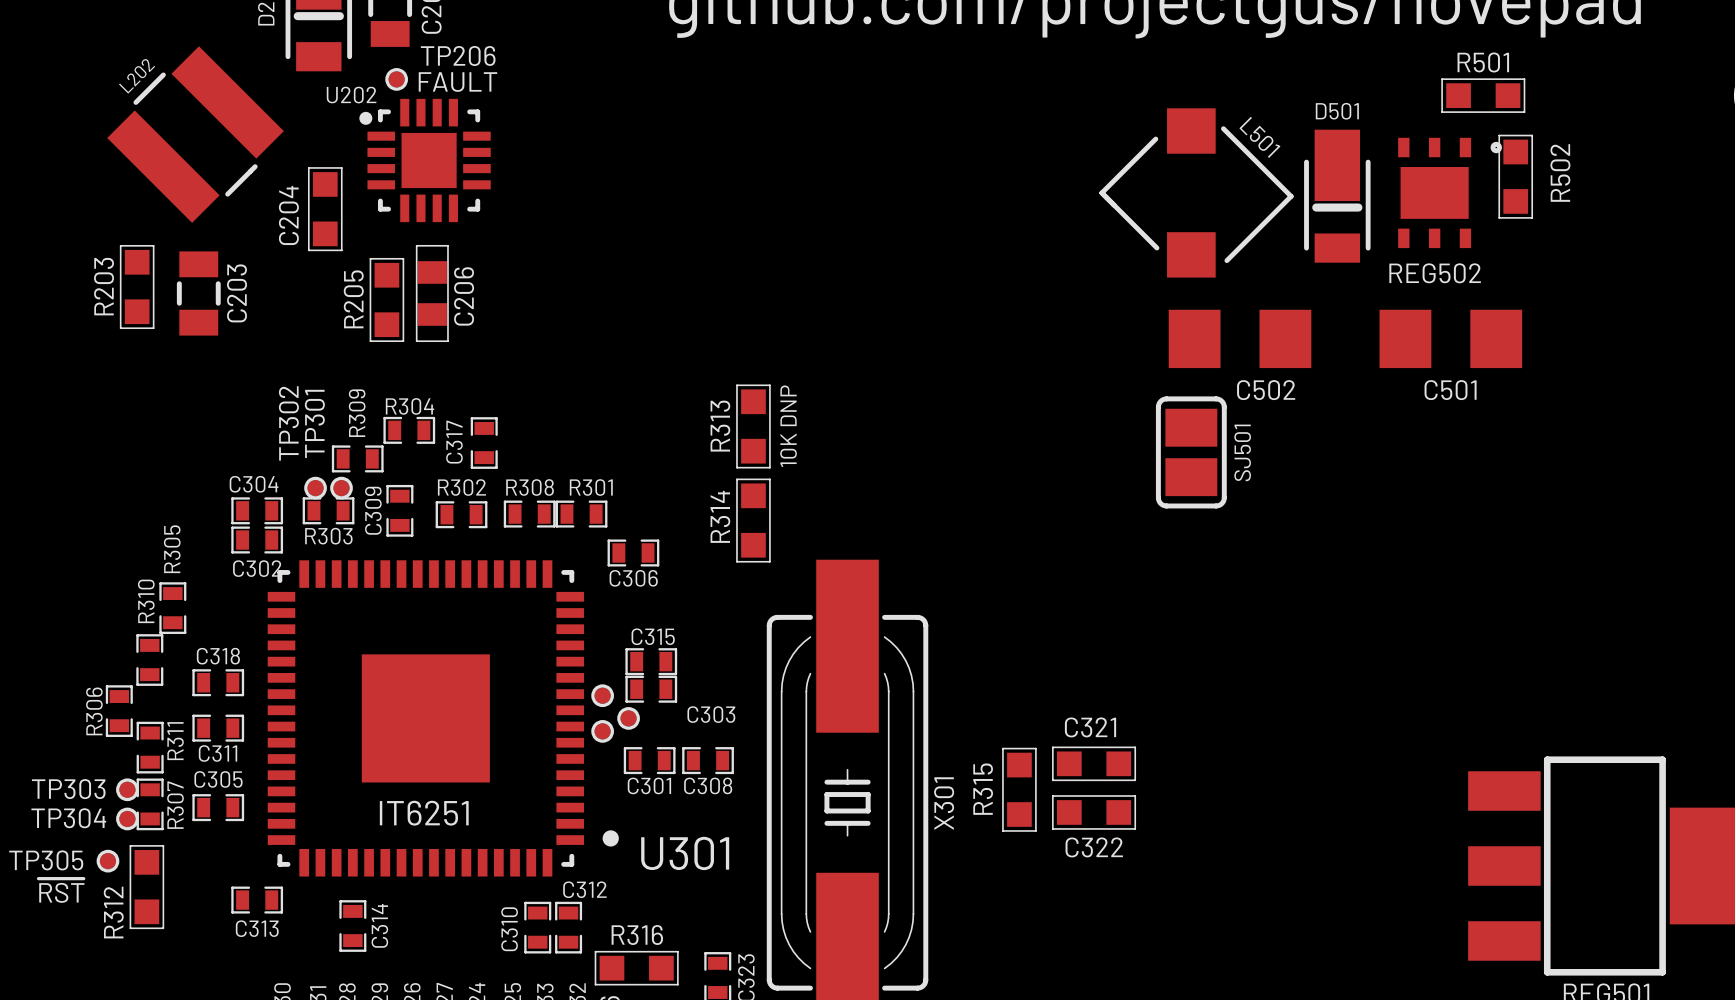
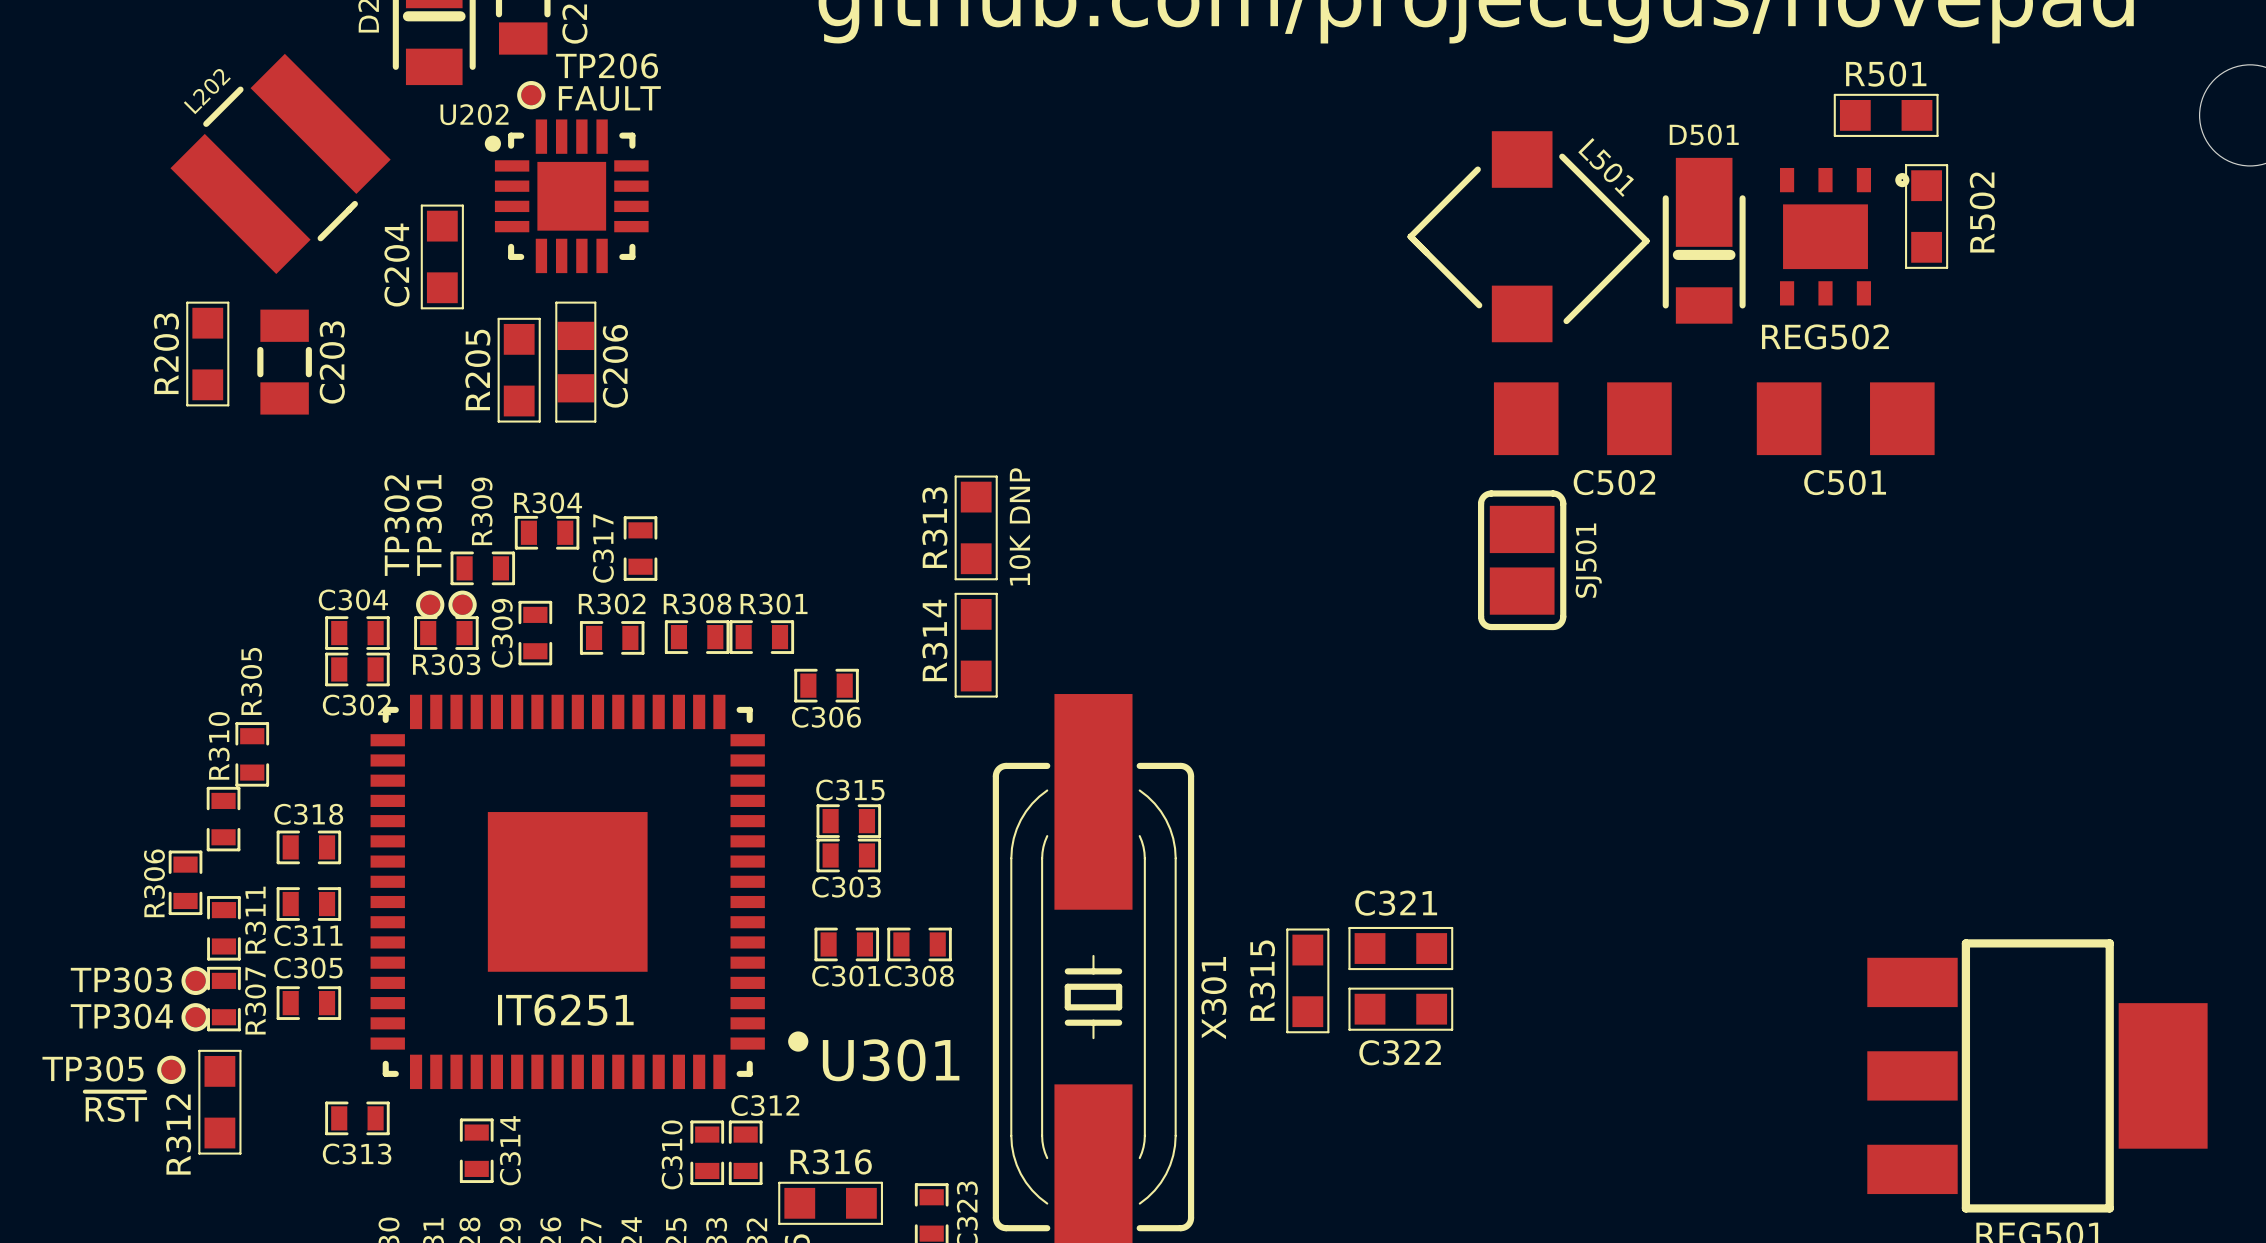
part: (602, 695) -> none
C303 name position: C303 (711, 714) -> C303 (846, 887)
part: (628, 718) -> none
part: (602, 731) -> none

